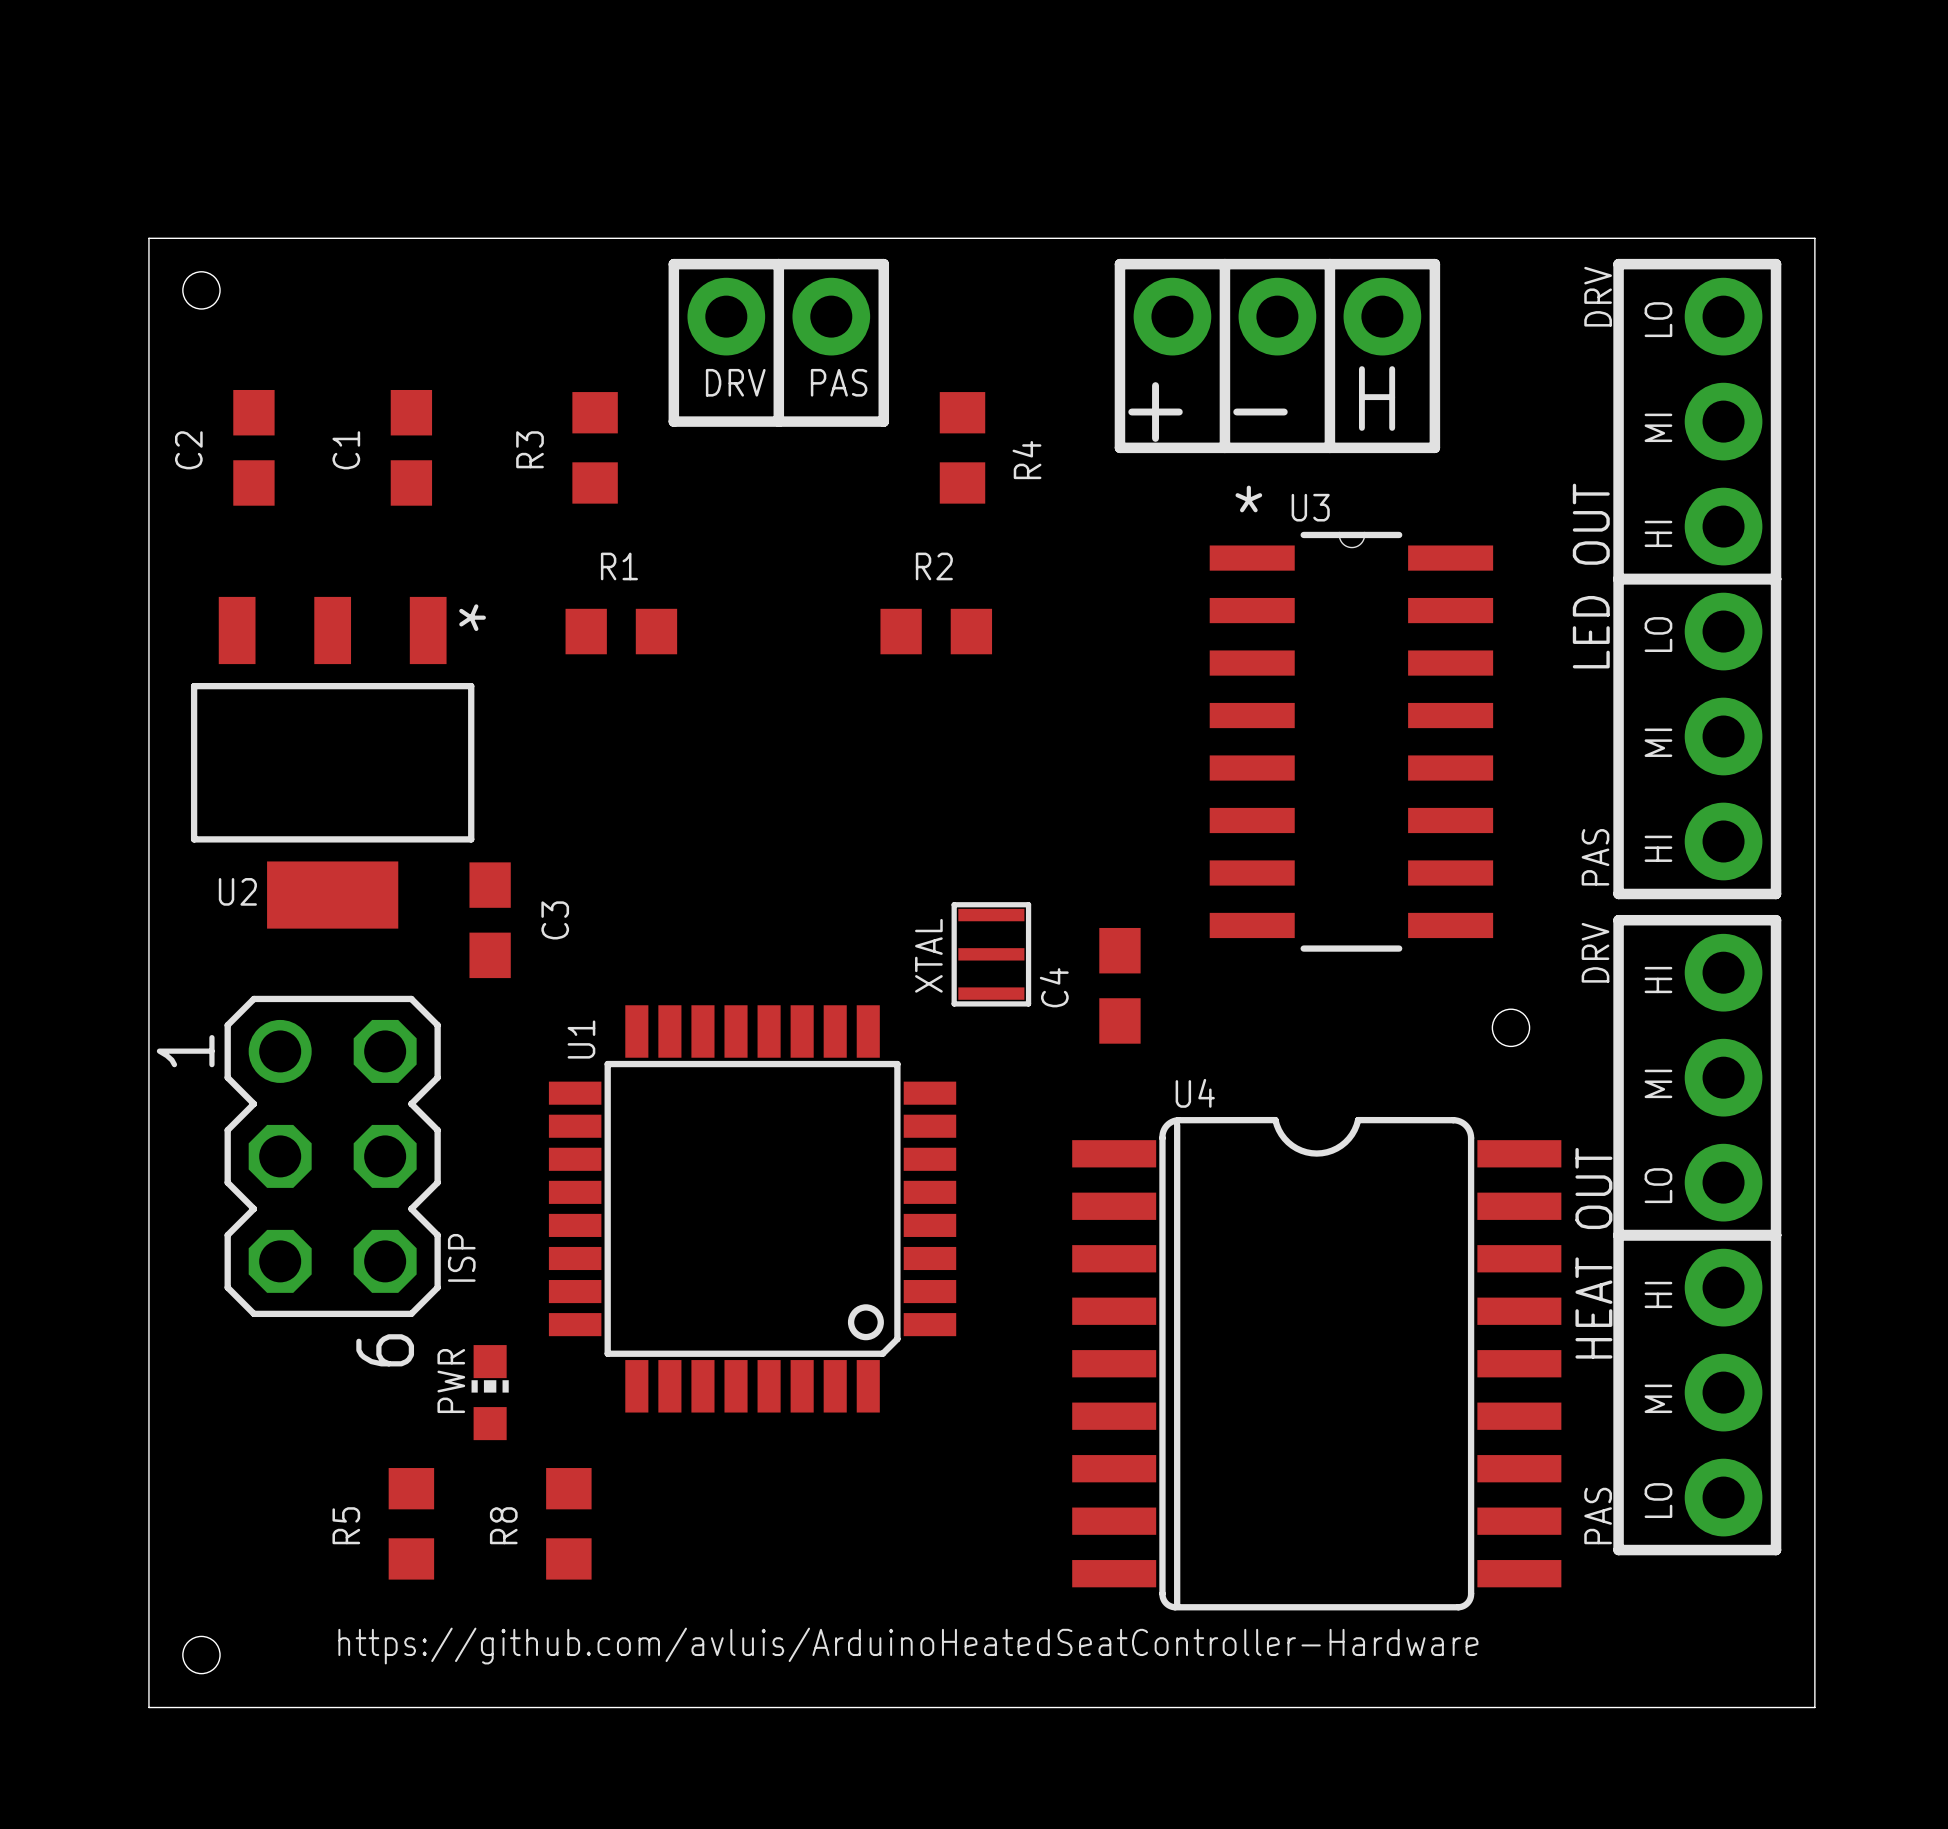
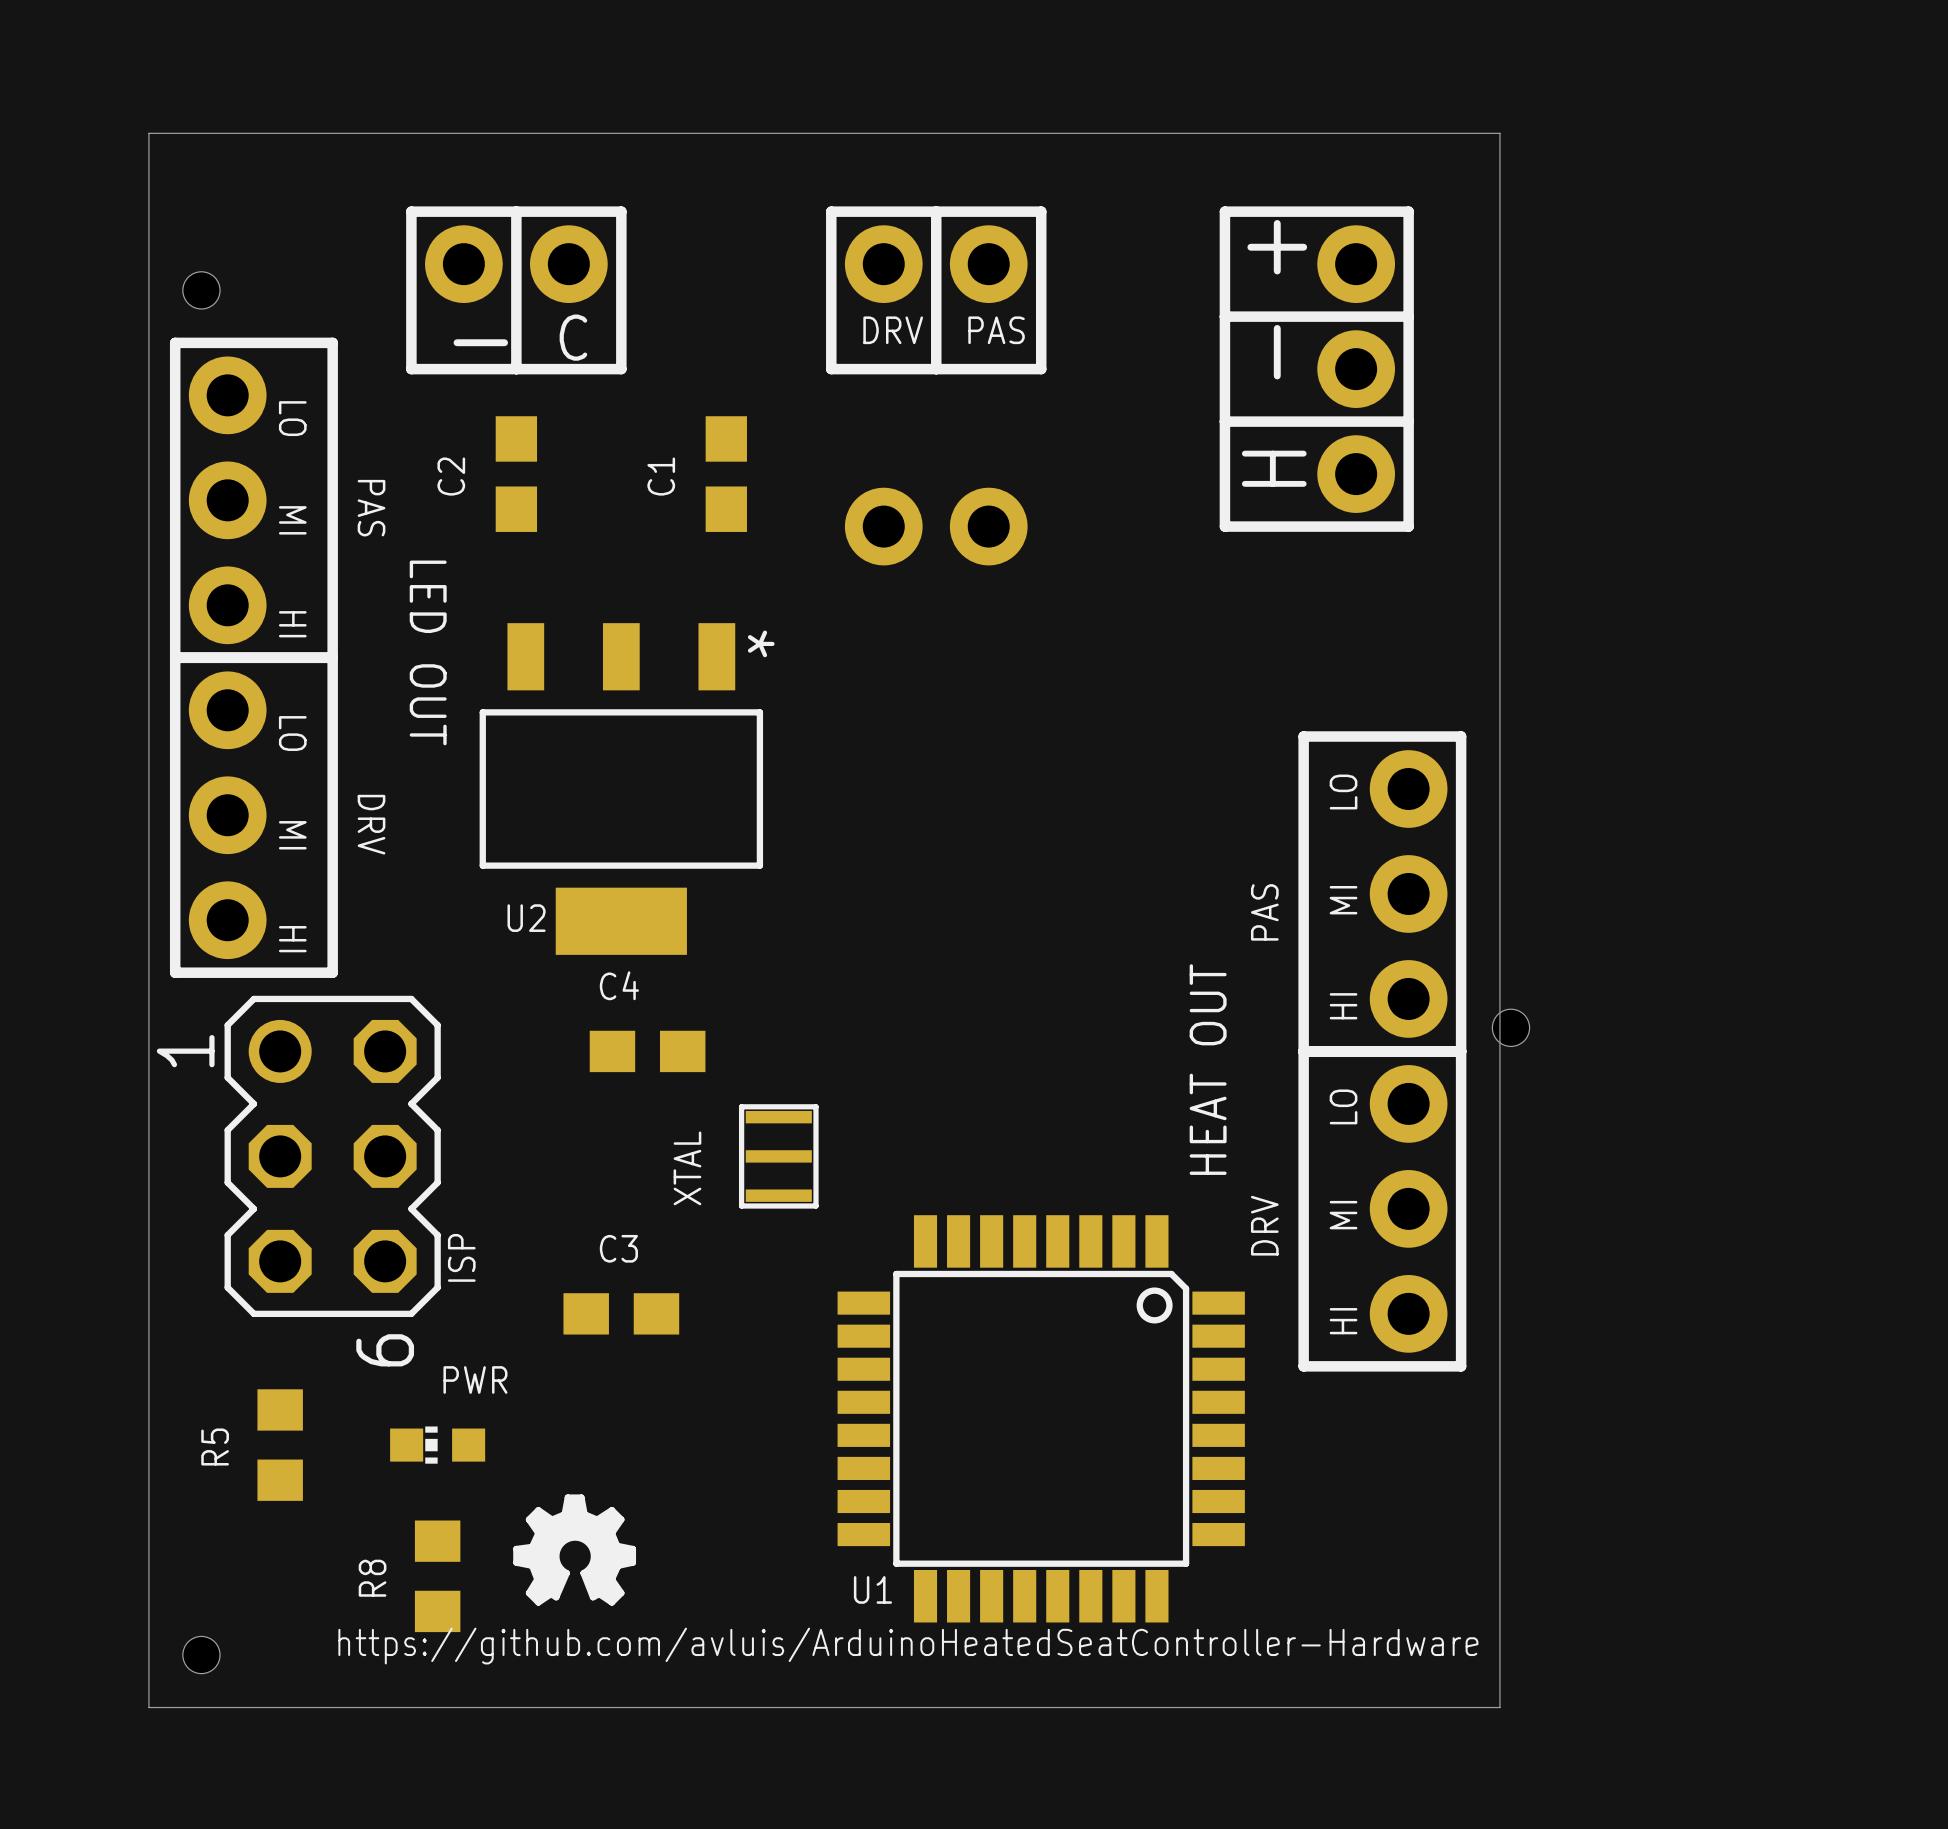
line: none -> (411, 211) (621, 211) (621, 369) (411, 369) (411, 211)
line: none -> (516, 211) (516, 369)
board edge: (148, 238) (1814, 238) (1814, 1707) (1499, 1707) -> (148, 238) (148, 133) (1499, 133) (1499, 1707)
part: none -> (516, 264)
line: (673, 264) (883, 264) (883, 421) (673, 421) (673, 264) -> (831, 211) (1041, 211) (1041, 369) (831, 369) (831, 211)
line: (778, 264) (778, 421) -> (936, 211) (936, 369)
part: none -> (936, 264)
line: (1119, 264) (1434, 264) (1434, 447) (1119, 447) (1119, 264) -> none
line: none -> (1224, 264) (1224, 211) (1408, 211) (1408, 526) (1224, 526) (1224, 447)
line: (1329, 264) (1329, 447) -> none
line: (1618, 264) (1618, 893) (1776, 893) (1776, 264) (1618, 264) -> none
text: DRV (1598, 296) -> none
part: (778, 316) -> none
line: none -> (1224, 316) (1408, 316)
part rotation: 0° (1277, 316) -> 90° clockwise (1356, 369)
text: LO (1658, 319) -> none
text: none -> C (573, 337)
line: none -> (175, 342) (175, 972) (332, 972) (332, 342) (175, 342)
text: none -> - (480, 342)
text position: DRV (735, 382) -> DRV (893, 330)
text position: PAS (839, 382) -> PAS (996, 330)
text rotation: 0° (1377, 398) -> 90° counterclockwise (1274, 468)
text rotation: 0° (1155, 412) -> 90° counterclockwise (1277, 247)
text position: + (1155, 412) -> + (1277, 247)
text rotation: 0° (1260, 412) -> 90° counterclockwise (1277, 352)
text: none -> LO (292, 418)
line: none -> (1224, 421) (1408, 421)
text: MI (1658, 427) -> none
C2 position: (253, 447) -> (516, 474)
C1 position: (411, 447) -> (726, 474)
R3: (595, 447) -> none
R4: (962, 447) -> none
text: none -> PAS (371, 508)
text: none -> MI (292, 520)
part: none -> (936, 526)
text: HI (1658, 533) -> none
text: LED OUT (1591, 576) -> none
line: (1618, 579) (1776, 579) -> none
part: (1723, 579) -> none
text: none -> HI (292, 624)
R1: (621, 631) -> none
R2: (936, 631) -> none
text: LO (1658, 634) -> none
text: none -> LED OUT (428, 652)
line: none -> (175, 657) (332, 657)
part: none -> (227, 657)
text: none -> LO (292, 733)
U3: (1351, 741) -> none
text: MI (1658, 742) -> none
U2 position: (332, 762) -> (621, 789)
text: none -> LO (1343, 792)
text: none -> DRV (371, 824)
text: none -> MI (292, 835)
text: HI (1658, 848) -> none
text position: PAS (1595, 857) -> PAS (1264, 912)
text: none -> MI (1343, 900)
C3 rotation: 0° (490, 920) -> 90° clockwise (621, 1313)
C3 position: (490, 920) -> (621, 1313)
C3 name position: C3 (555, 920) -> C3 (618, 1248)
line: (1618, 920) (1618, 1550) (1776, 1550) (1776, 920) (1618, 920) -> (1303, 736) (1303, 1366) (1461, 1366) (1461, 736) (1303, 736)
text: none -> HI (292, 939)
text position: DRV (1595, 952) -> DRV (1264, 1225)
part position: (991, 954) -> (778, 1156)
text position: XTAL (928, 955) -> XTAL (687, 1168)
text: HI (1658, 980) -> none
C4 rotation: 0° (1119, 985) -> 90° clockwise (647, 1051)
C4 position: (1119, 985) -> (647, 1051)
text: none -> HI (1343, 1006)
part: none -> (1408, 1051)
text: MI (1658, 1083) -> none
text: none -> LO (1343, 1106)
text: LO (1658, 1185) -> none
U1 rotation: 0° (752, 1208) -> 90° counterclockwise (1041, 1418)
U1 position: (752, 1208) -> (1041, 1418)
text: none -> MI (1343, 1215)
line: (1618, 1235) (1776, 1235) -> (1303, 1051) (1461, 1051)
part: (1723, 1235) -> none
text position: HEAT OUT (1593, 1253) -> HEAT OUT (1208, 1069)
text: HI (1658, 1294) -> none
text: none -> HI (1343, 1321)
U4: (1316, 1363) -> none
PWR name position: PWR (451, 1381) -> PWR (475, 1380)
PWR rotation: 0° (490, 1392) -> 90° counterclockwise (437, 1445)
PWR position: (490, 1392) -> (437, 1445)
text: MI (1658, 1398) -> none
drawing: none -> [513, 1494, 637, 1606]
text: LO (1658, 1500) -> none
text: PAS (1598, 1516) -> none
R5 position: (411, 1523) -> (280, 1445)
R8 position: (568, 1523) -> (437, 1576)

